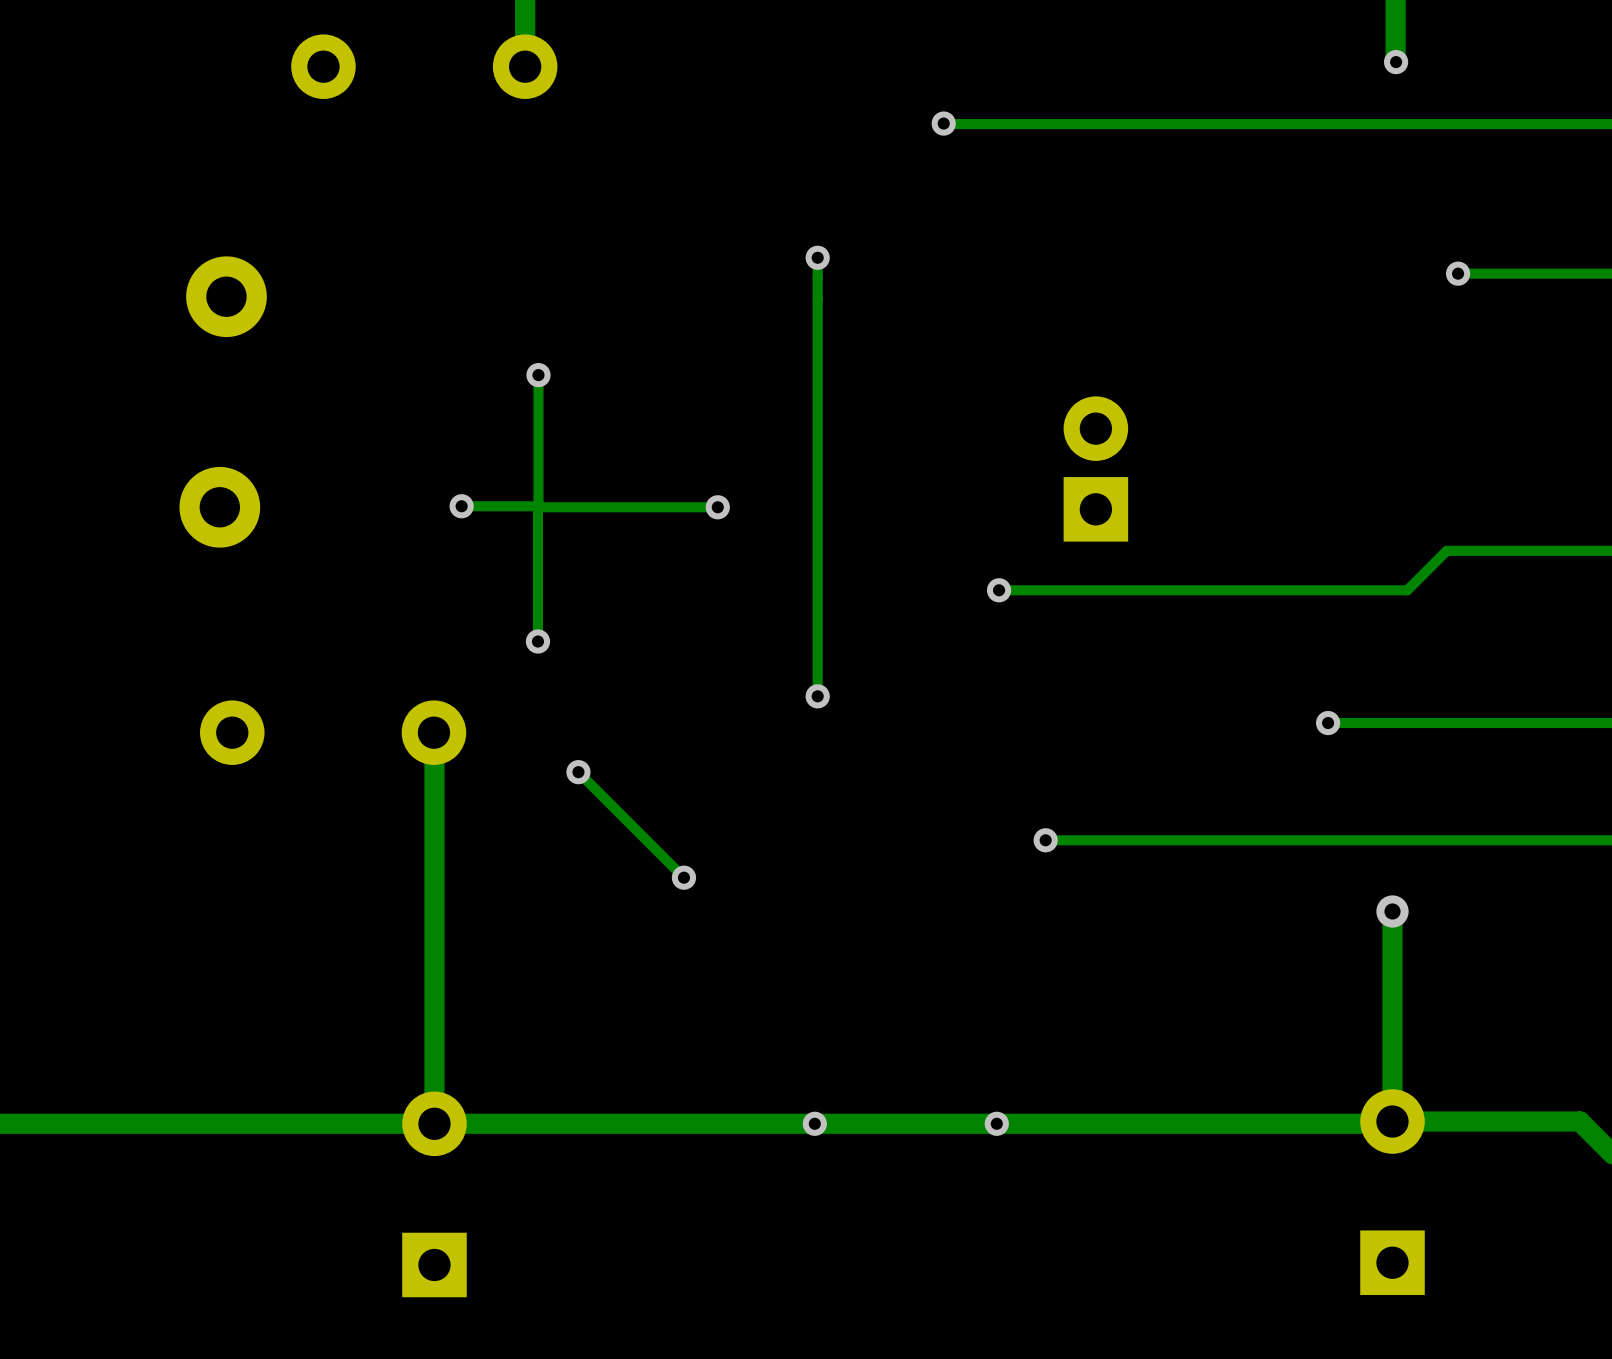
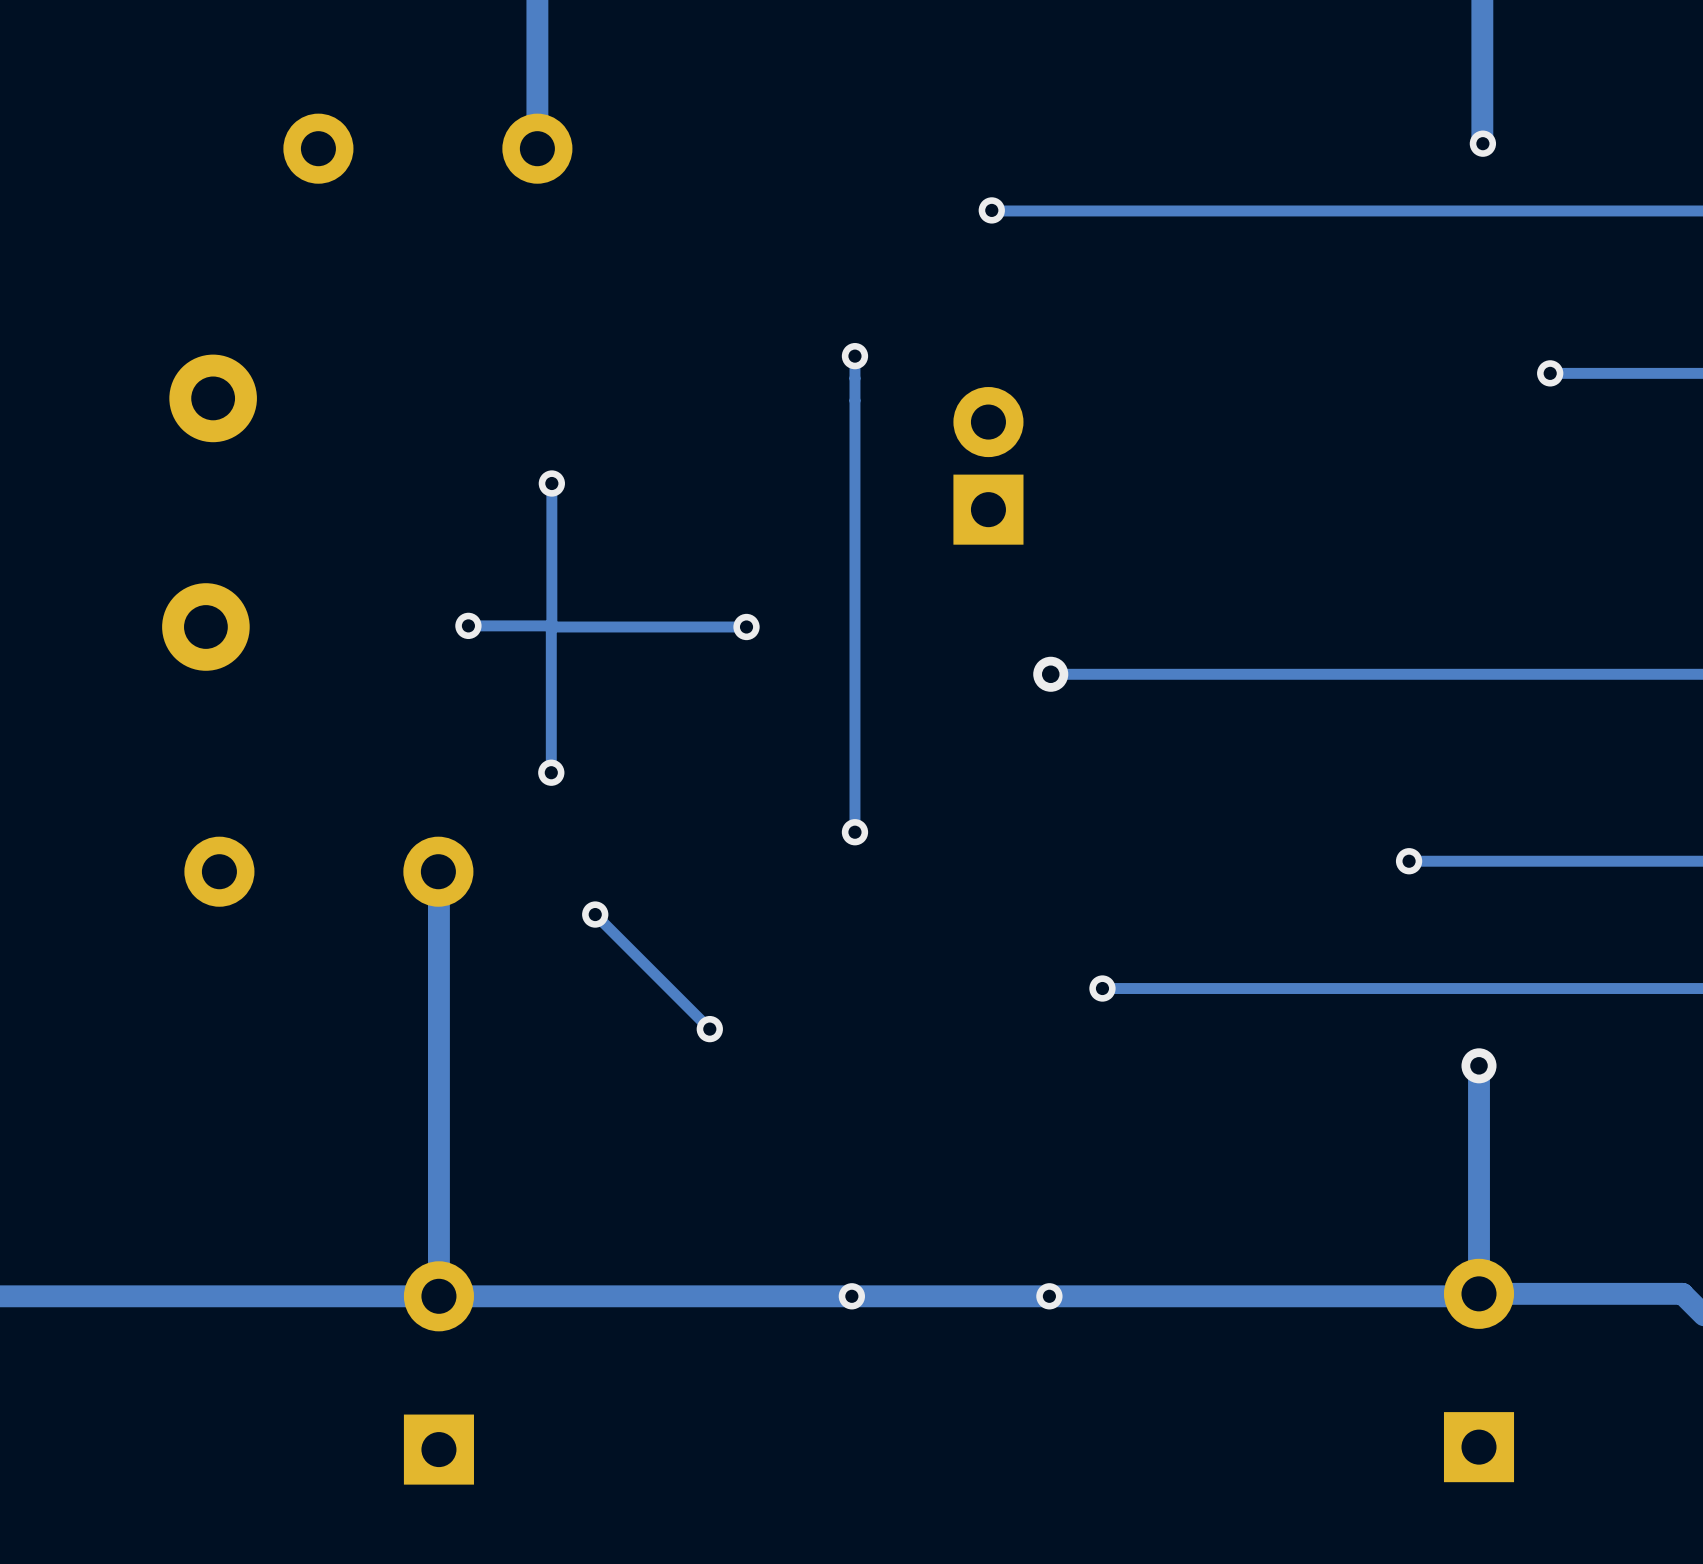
part position: (1095, 468) -> (988, 465)
via: none -> (1050, 674)
track: (1446, 550) (1407, 590) (999, 590) -> (1537, 674) (1050, 674)
via: (999, 590) -> none

